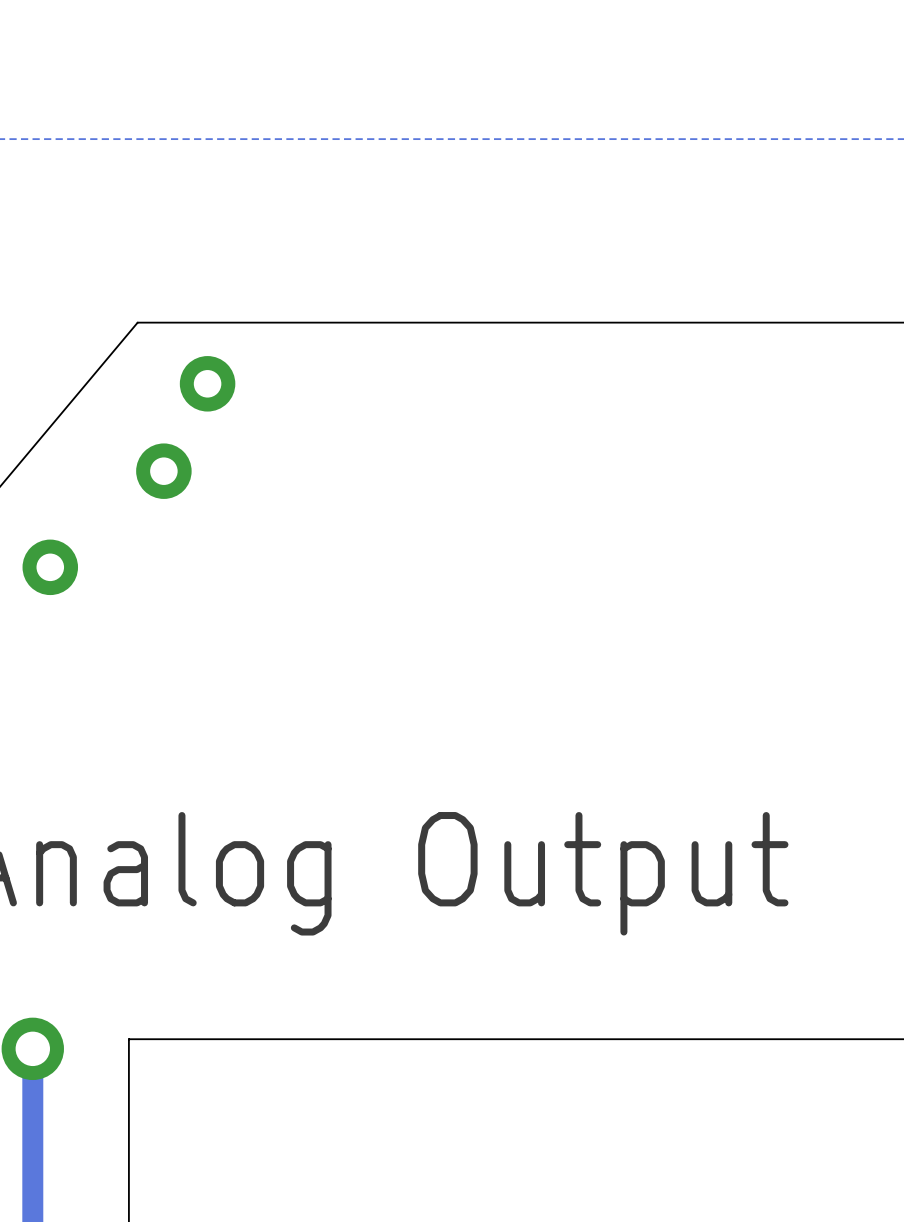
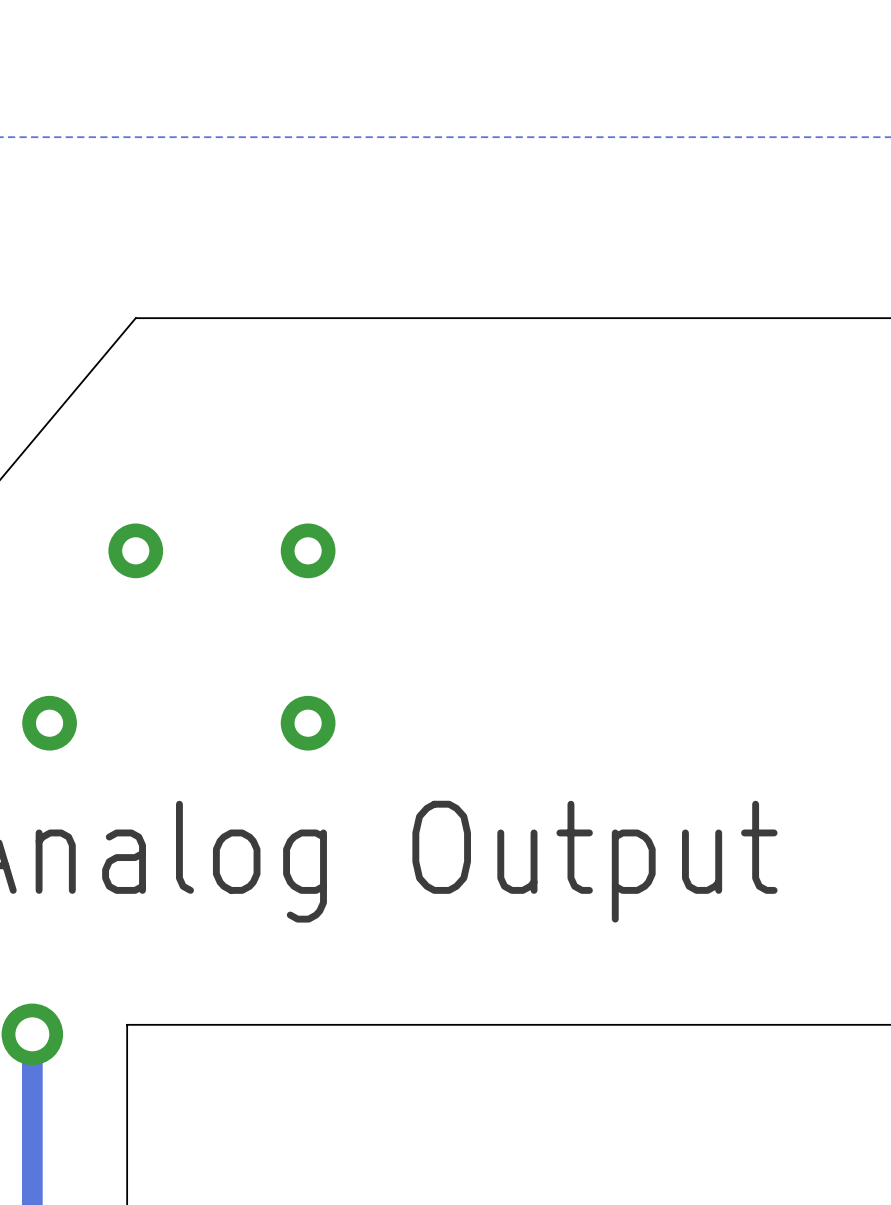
via: (207, 383) -> none
via: (163, 471) -> none
via: none -> (135, 550)
via: none -> (308, 550)
via: (50, 567) -> none
via: none -> (49, 723)
via: none -> (308, 723)

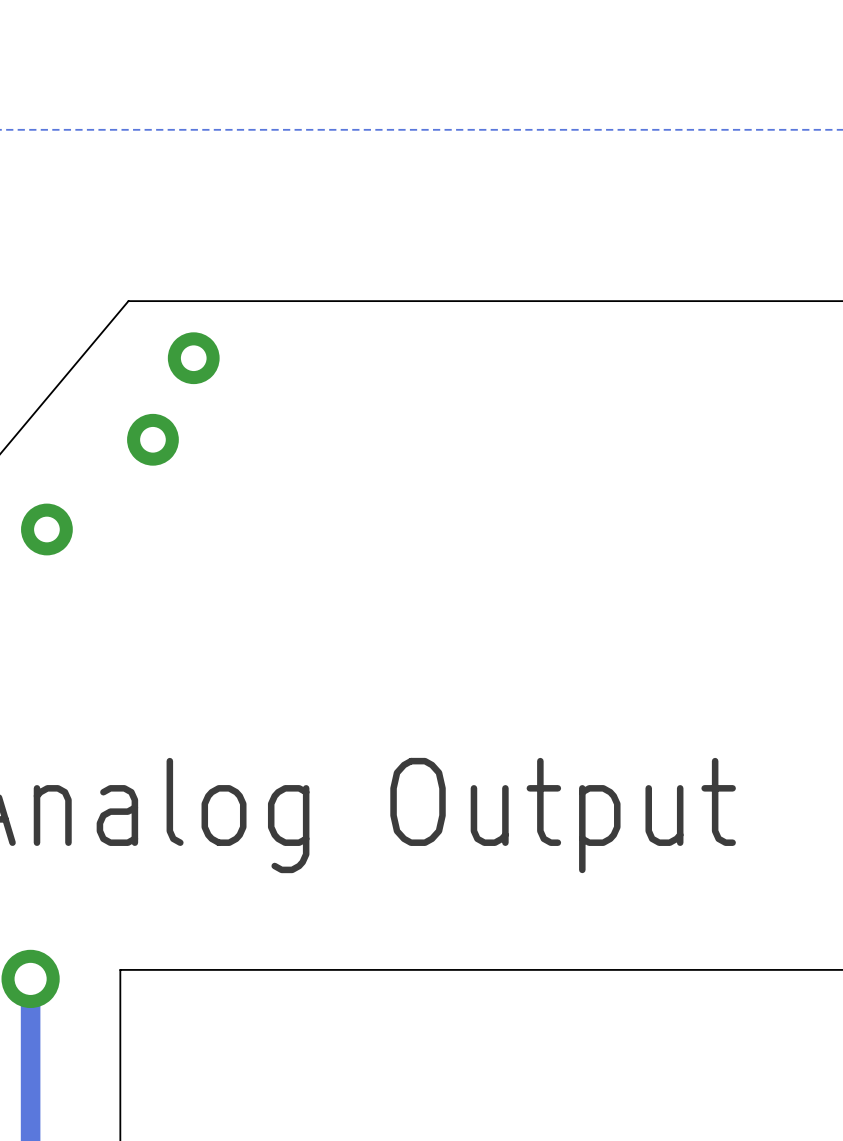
via: none -> (193, 358)
via: none -> (152, 439)
via: (135, 550) -> none
via: (308, 550) -> none
via: none -> (46, 529)
via: (49, 723) -> none
via: (308, 723) -> none

